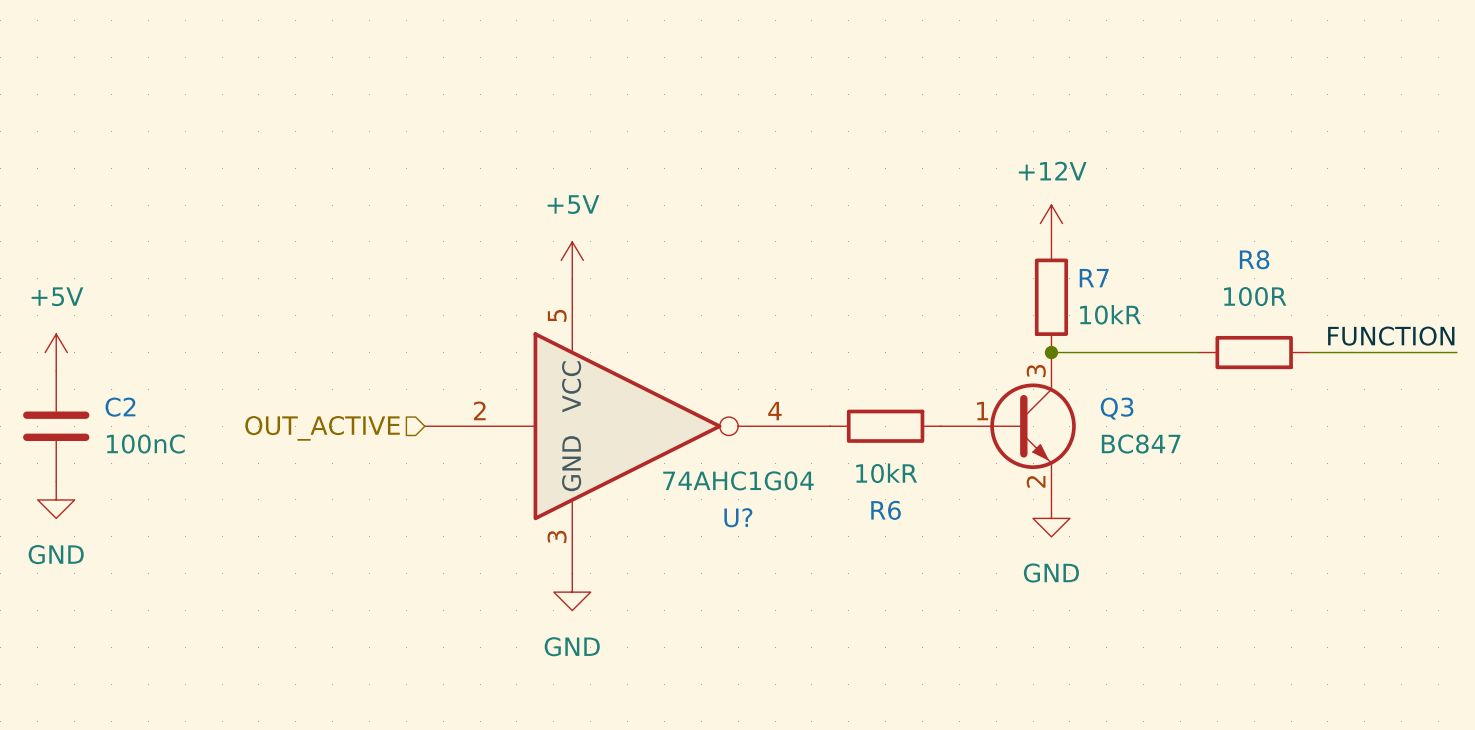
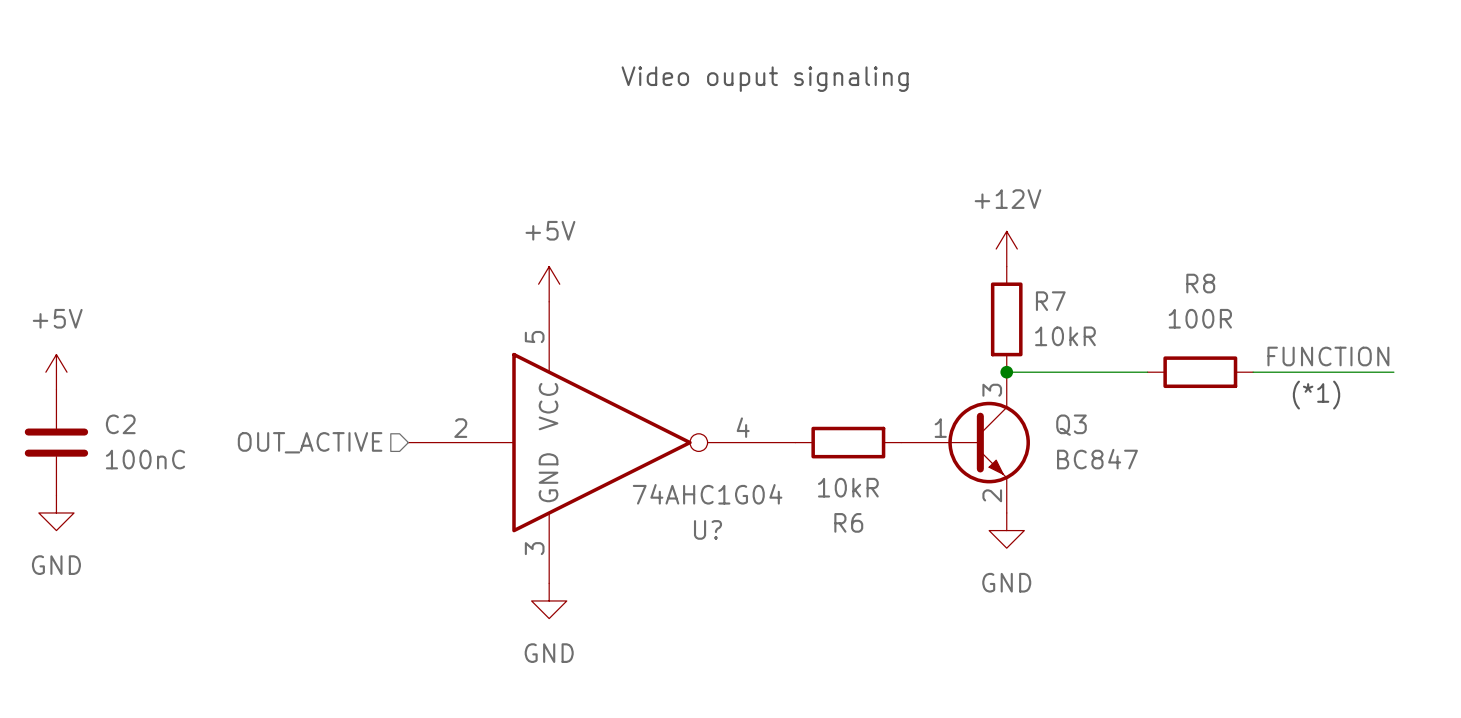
text: none -> Video ouput signaling (765, 79)
text: none -> (*1) (1316, 395)

